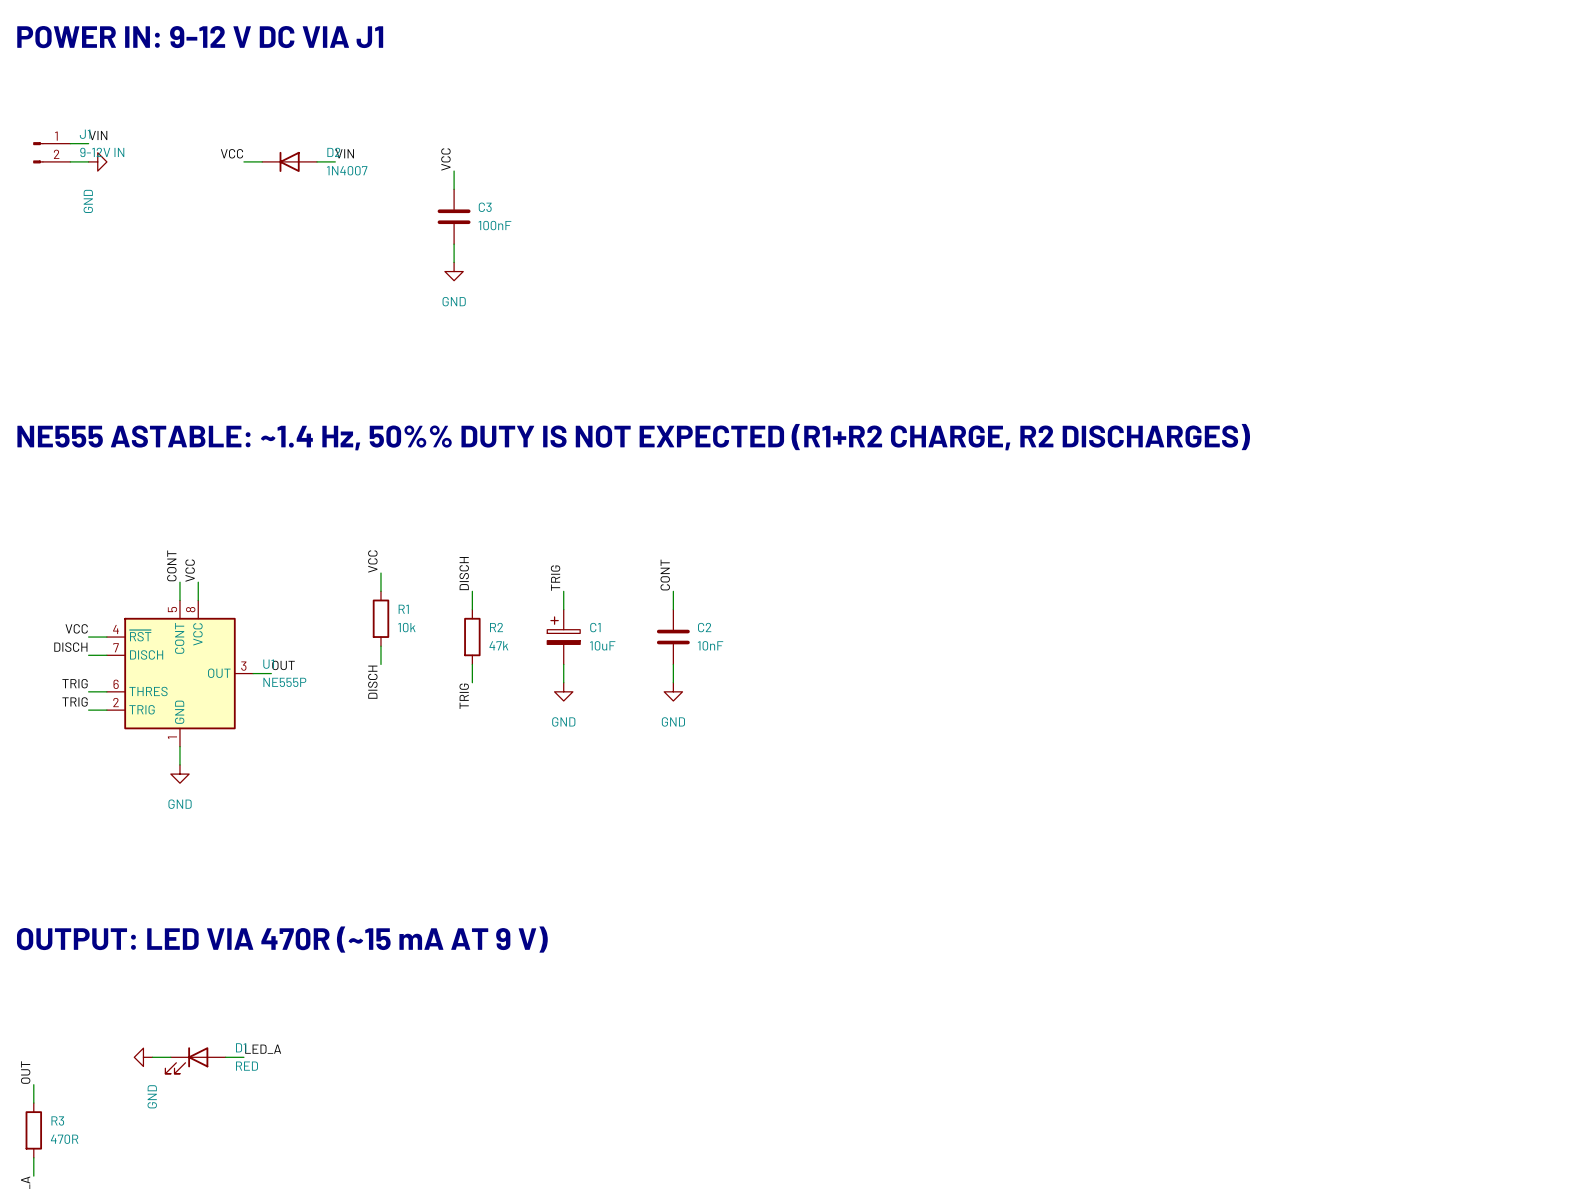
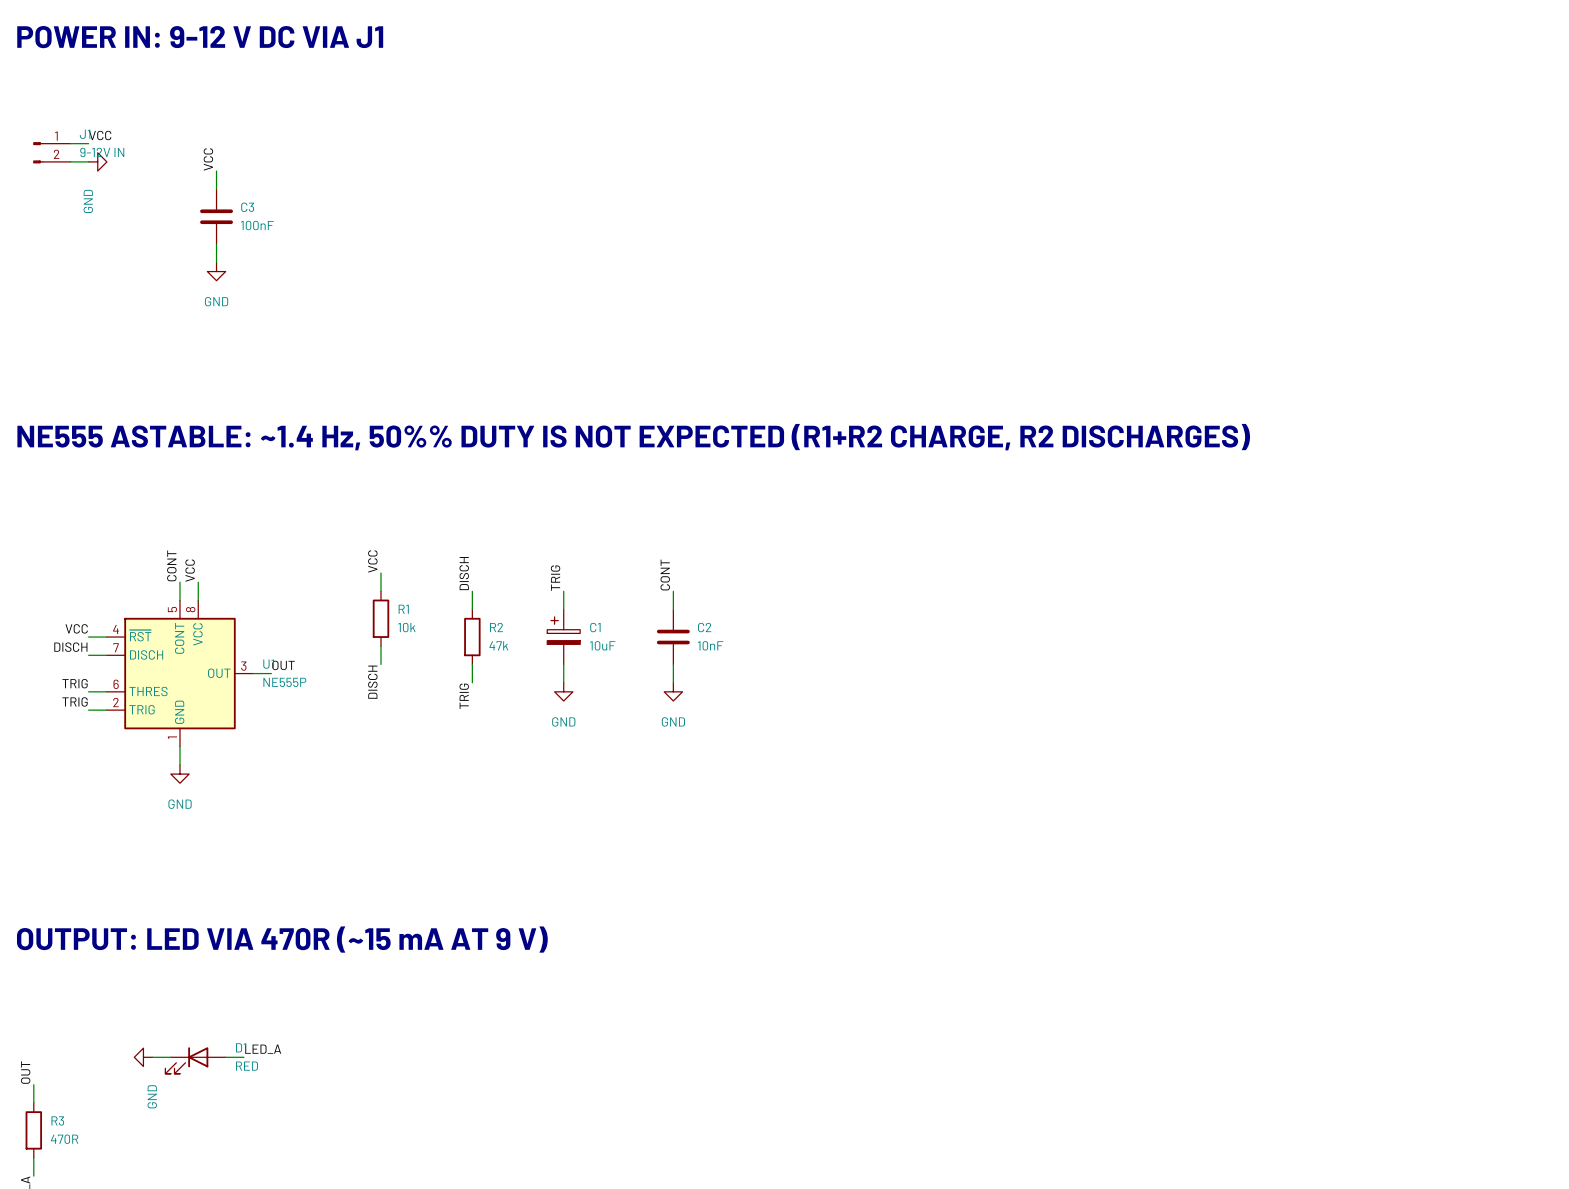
label: VIN (98, 135) -> VCC (100, 135)
label rotation: 0° (231, 153) -> 90° counterclockwise (208, 159)
label: VIN (344, 153) -> none
label: VCC (445, 159) -> none
wire: (243, 161) (262, 161) -> none
D2: 1N4007 (289, 161) -> none
wire: (317, 161) (335, 161) -> none
wire: none -> (216, 171) (216, 189)
wire: (454, 171) (454, 189) -> none
C3 position: (454, 216) -> (216, 216)
wire: none -> (216, 244) (216, 262)
wire: (454, 244) (454, 262) -> none
power symbol: none -> GND (216, 271)
power symbol: GND (454, 271) -> none

